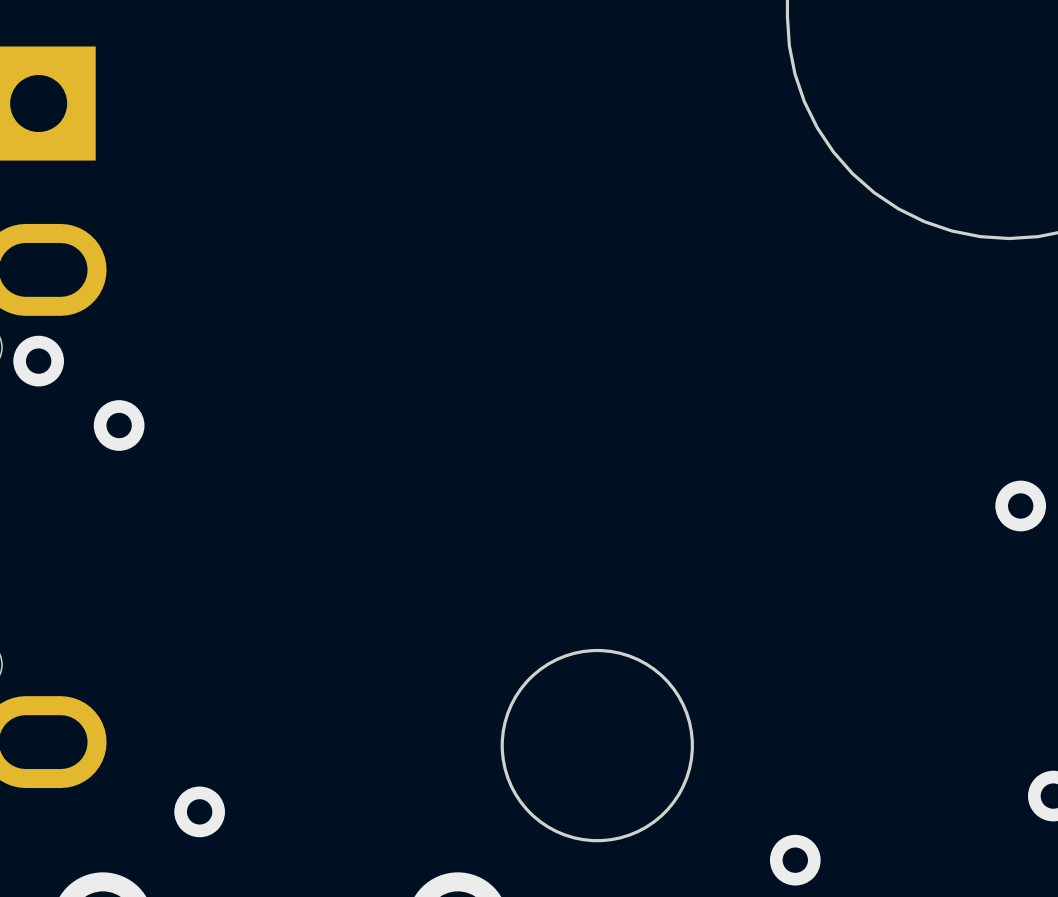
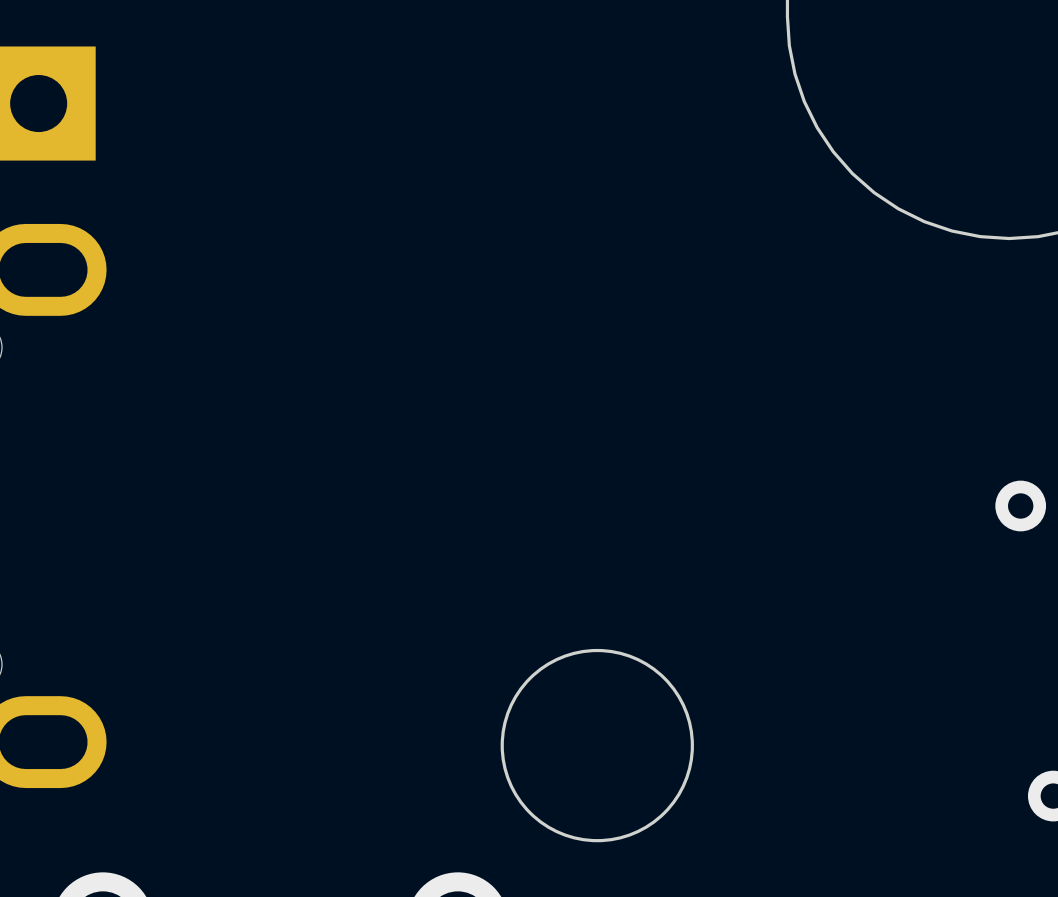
via: (38, 361) -> none
via: (119, 425) -> none
via: (199, 811) -> none
via: (795, 860) -> none

